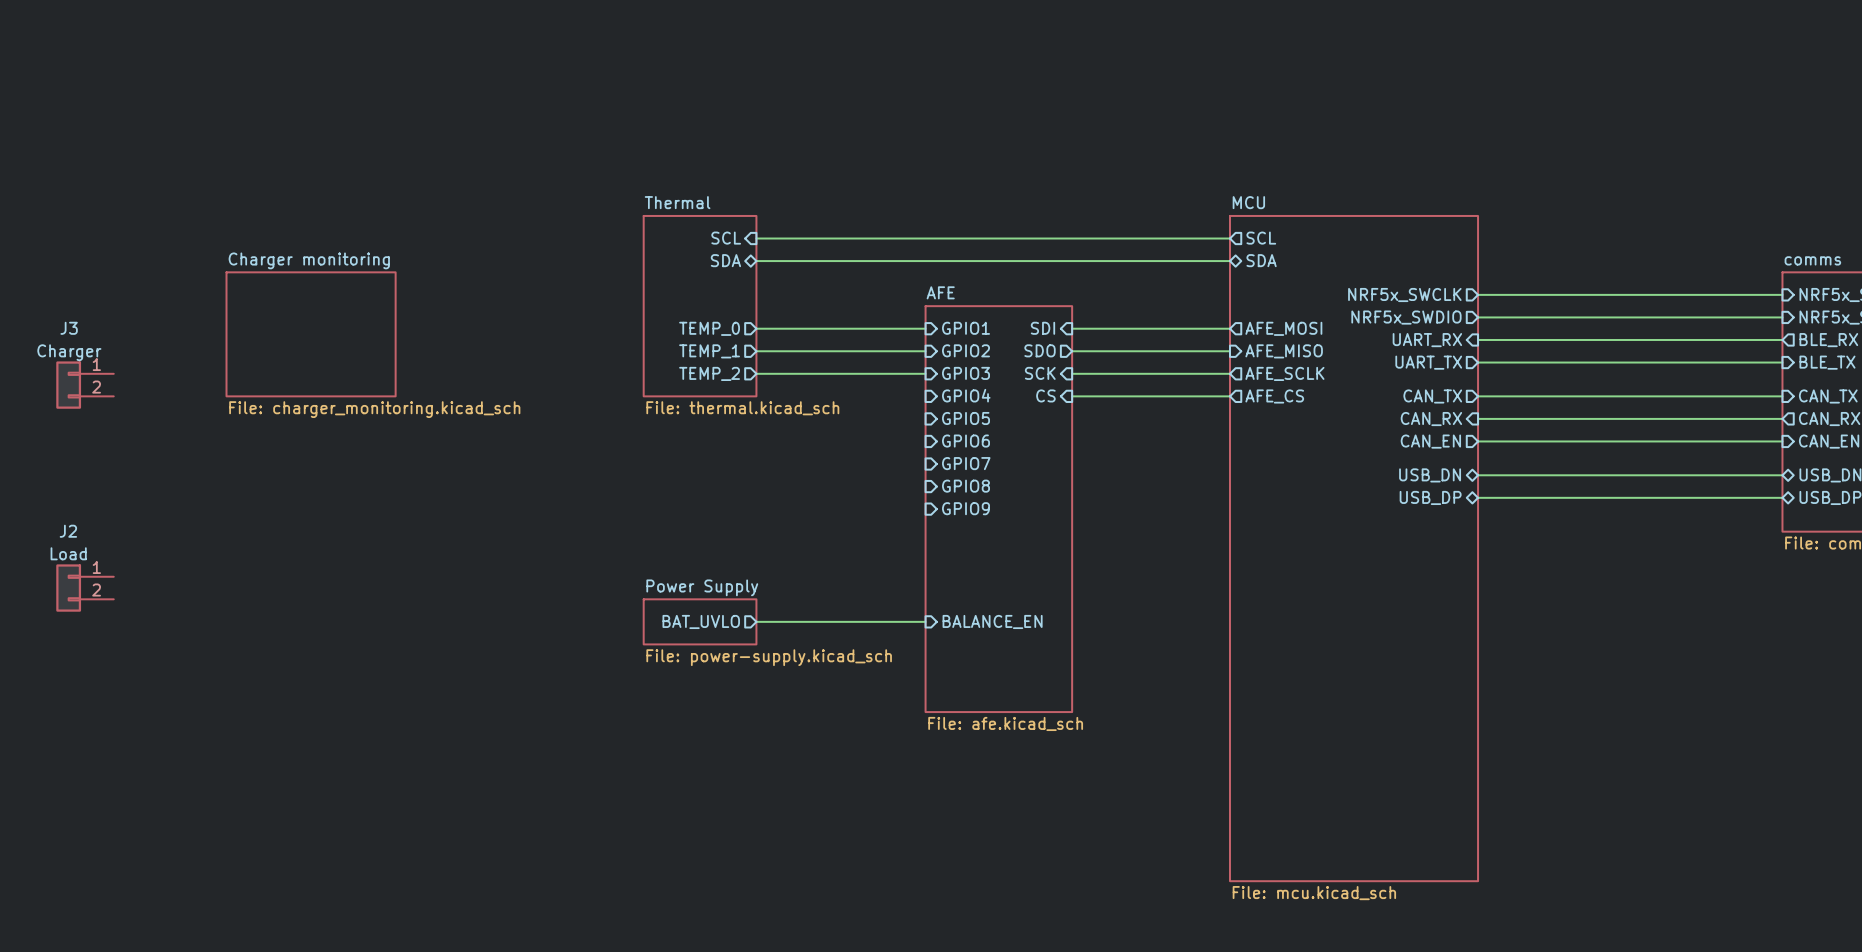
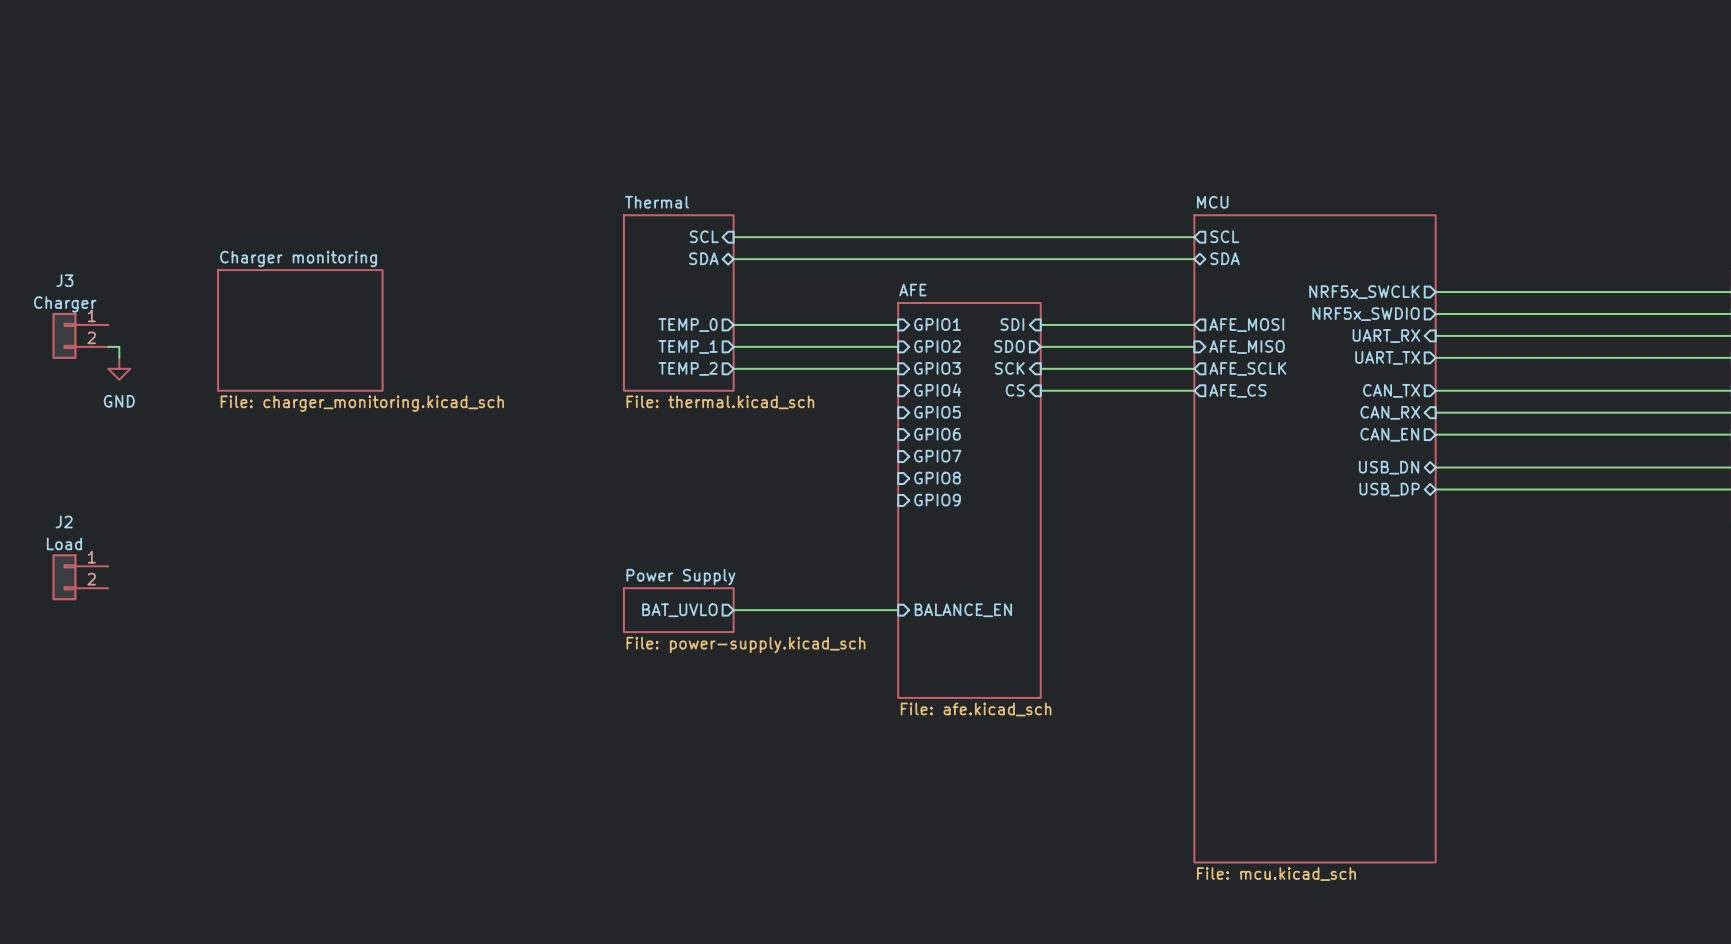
wire: none -> (108, 346) (119, 346) (119, 357)
power symbol: none -> GND (119, 368)
J3 position: (85, 385) -> (80, 335)

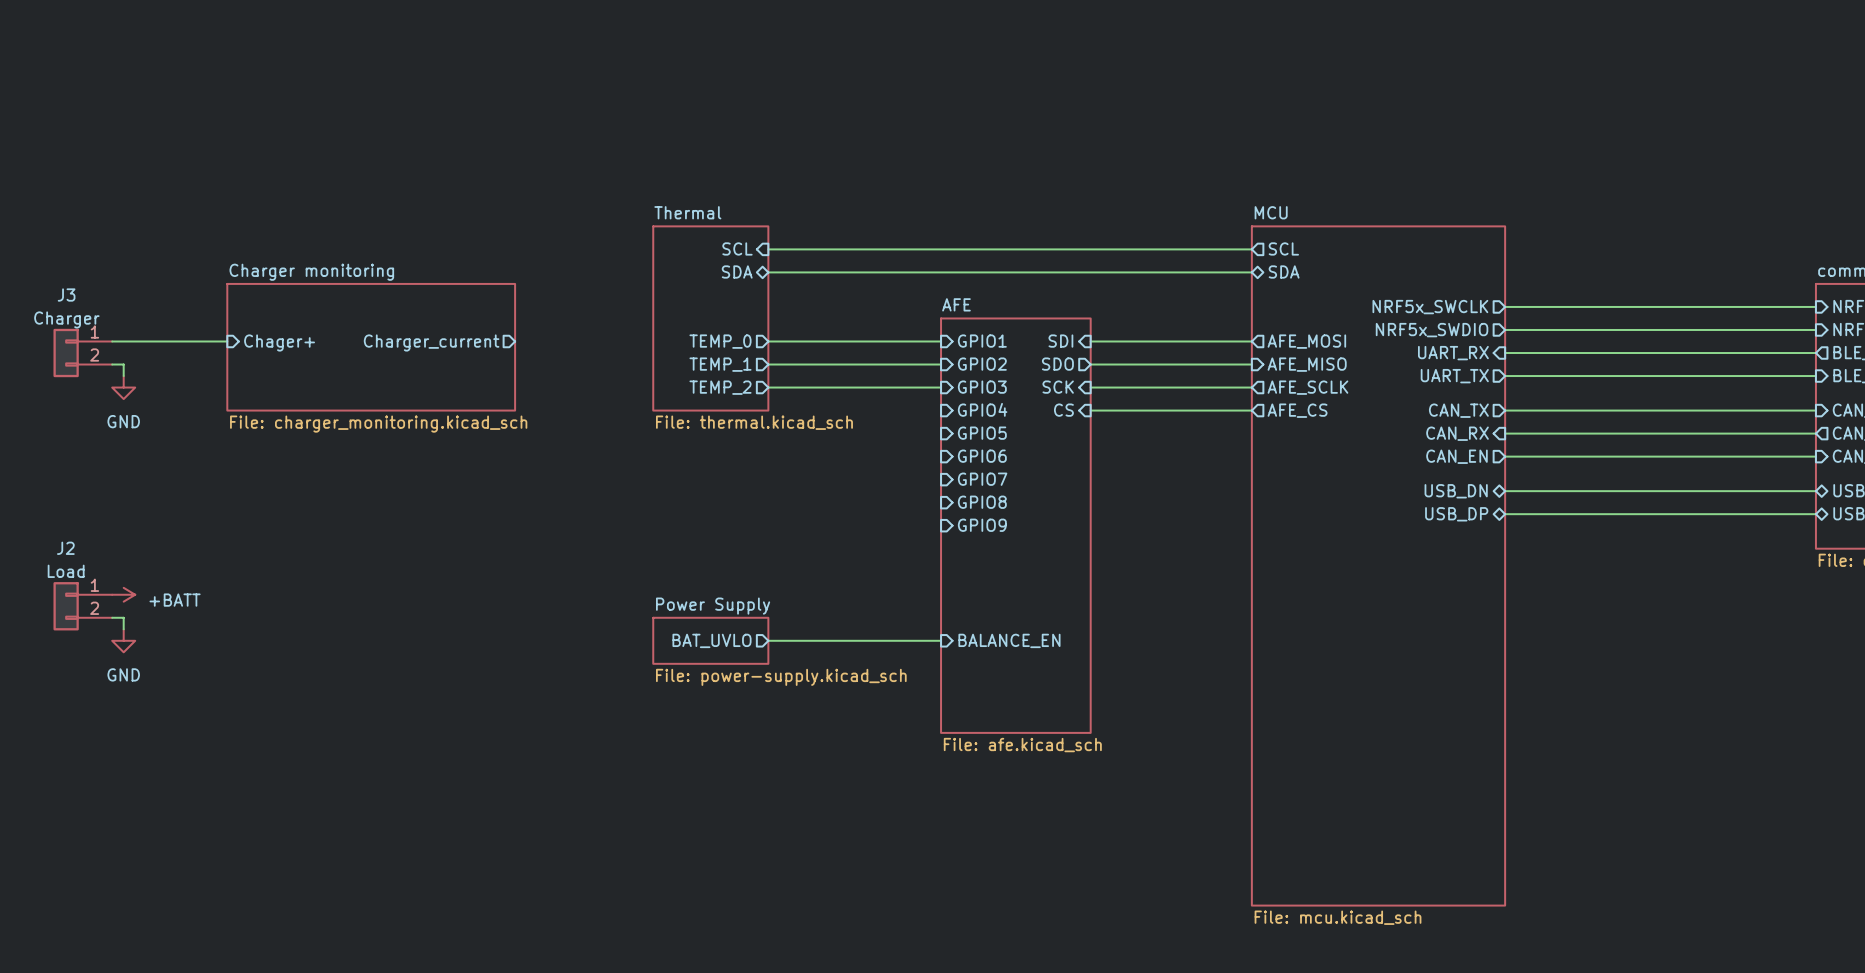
wire: none -> (112, 341) (227, 341)
sheet pin: none -> Chager+ (279, 342)
sheet pin: none -> Charger_current (431, 342)
sheet Charger monitoring: File: charger_monitoring.kicad_sch (300, 330) -> none
sheet Charger monitoring: none -> File: charger_monitoring.kicad_sch (371, 347)
power symbol: none -> +BATT (123, 594)
wire: none -> (112, 617) (123, 617) (123, 629)
power symbol: none -> GND (123, 640)

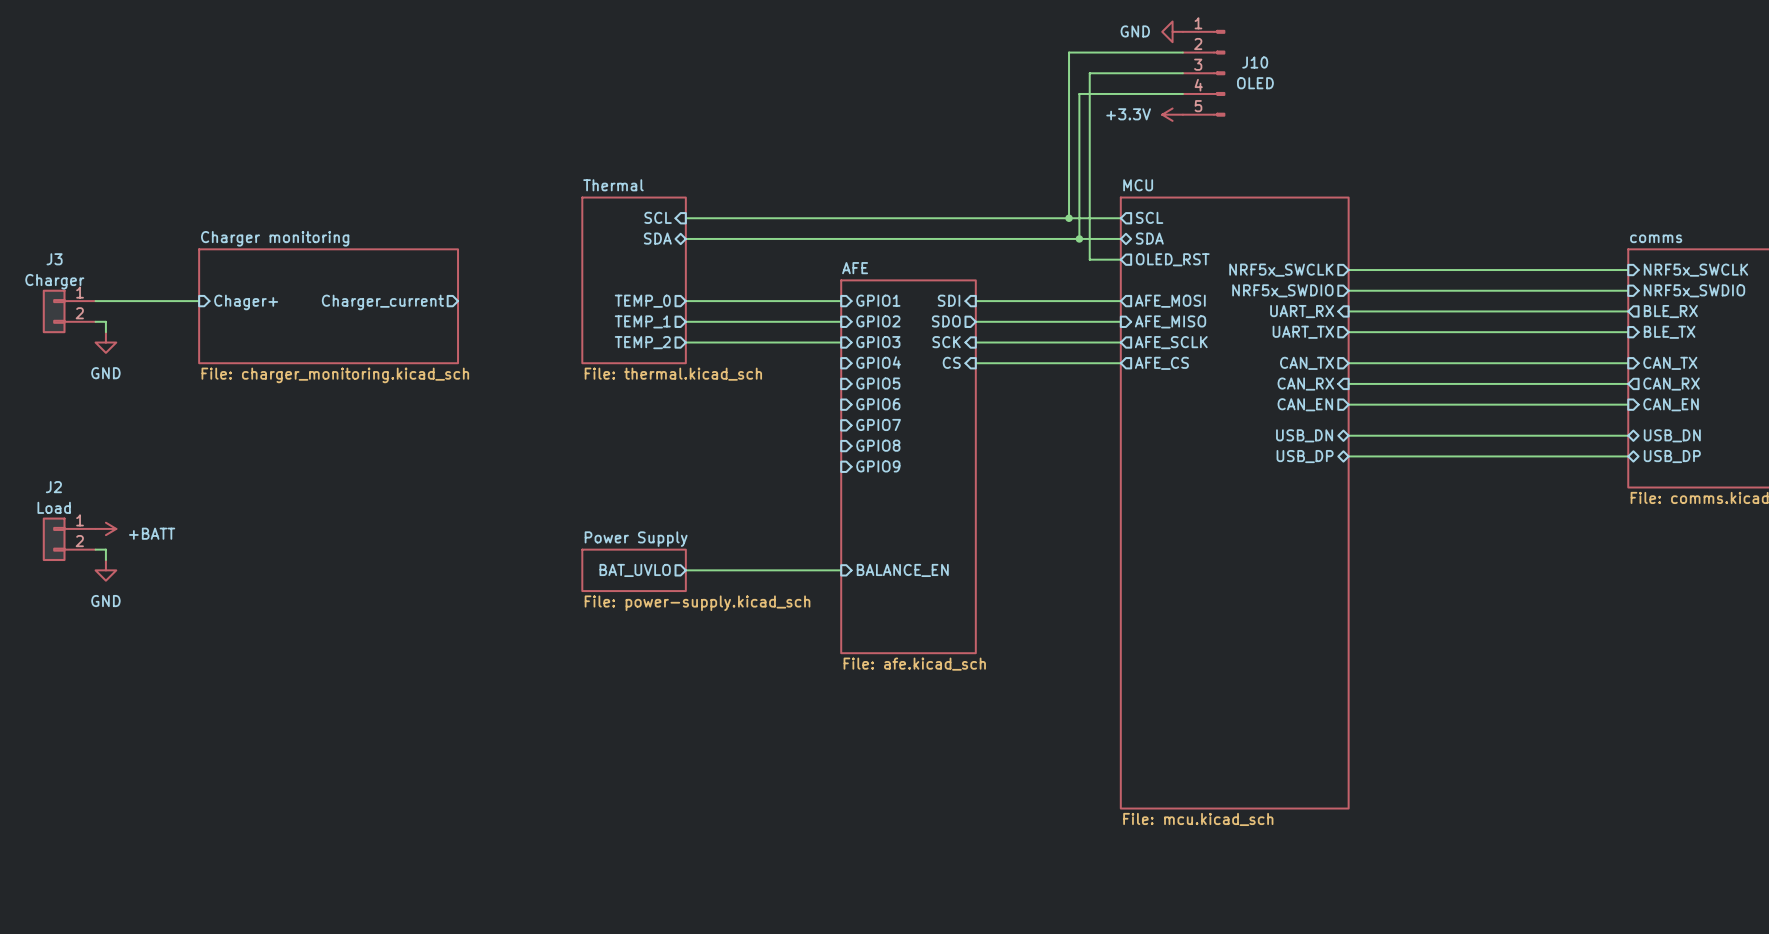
power symbol: none -> GND (1172, 31)
wire: none -> (1182, 52) (1069, 52) (1069, 218)
wire: none -> (1182, 73) (1089, 73) (1089, 259) (1120, 259)
J10: none -> OLED (1203, 73)
wire: none -> (1182, 93) (1079, 93) (1079, 238)
power symbol: none -> +3.3V (1172, 114)
junction: none -> (1069, 218)
junction: none -> (1079, 238)
sheet pin: none -> OLED_RST (1172, 259)

